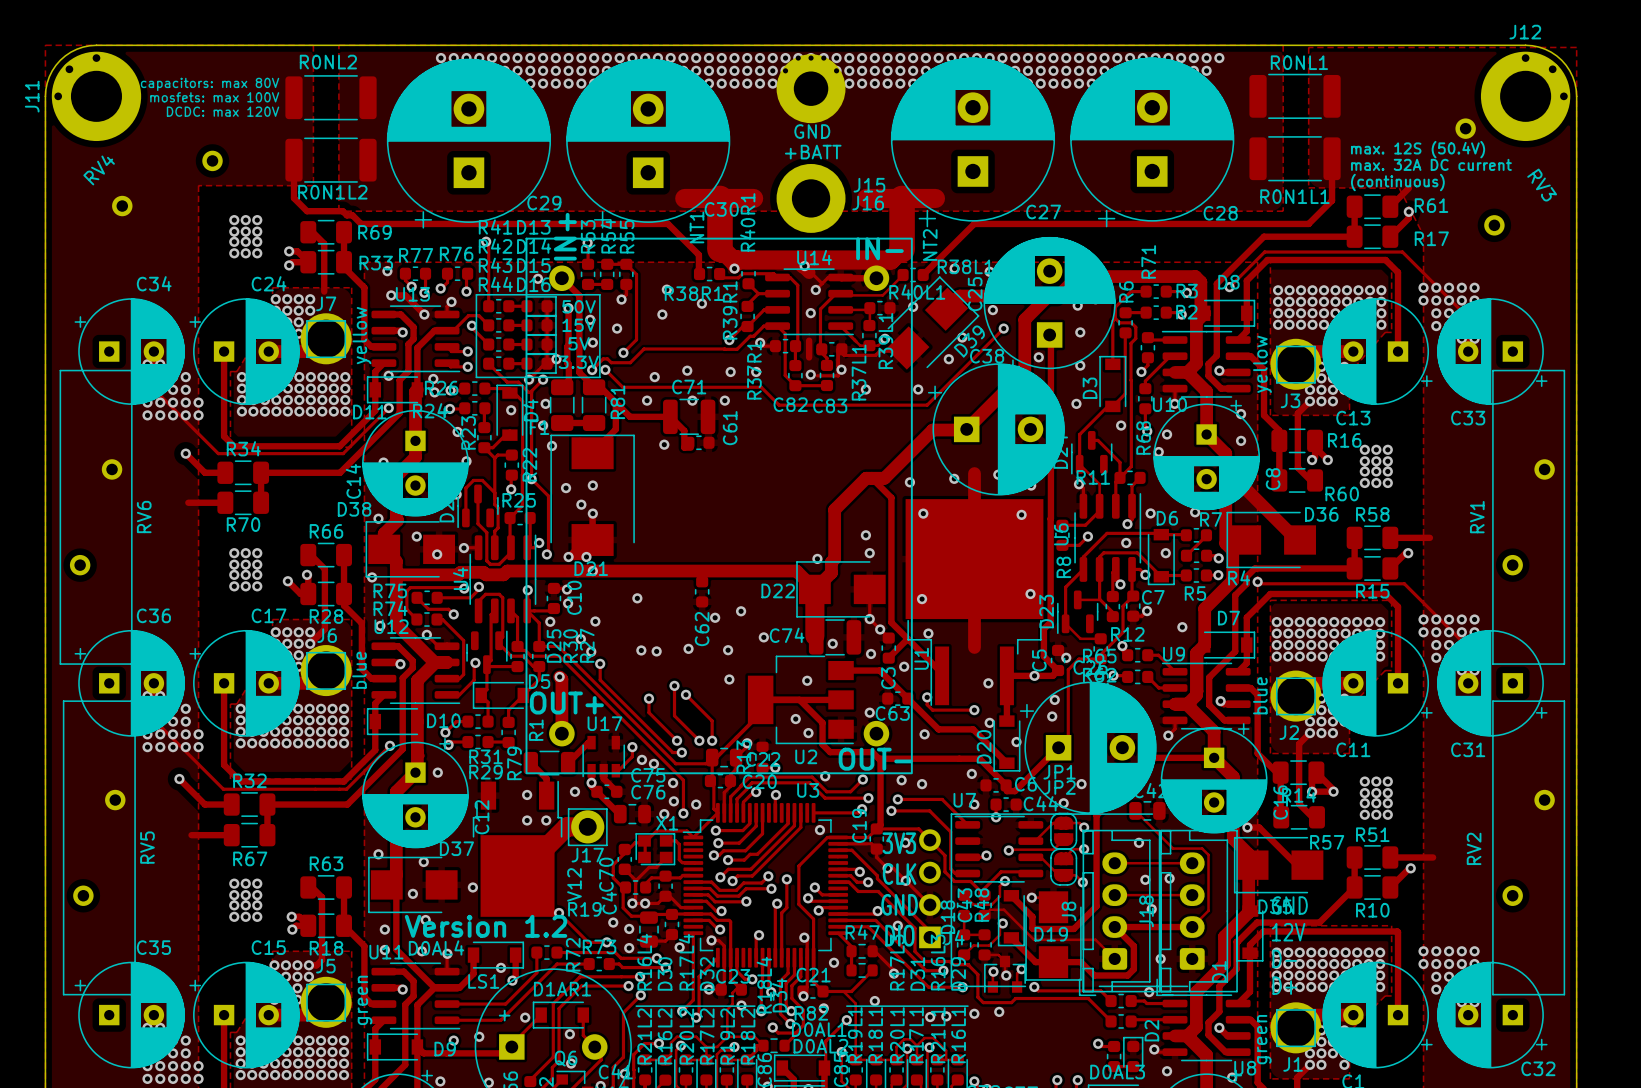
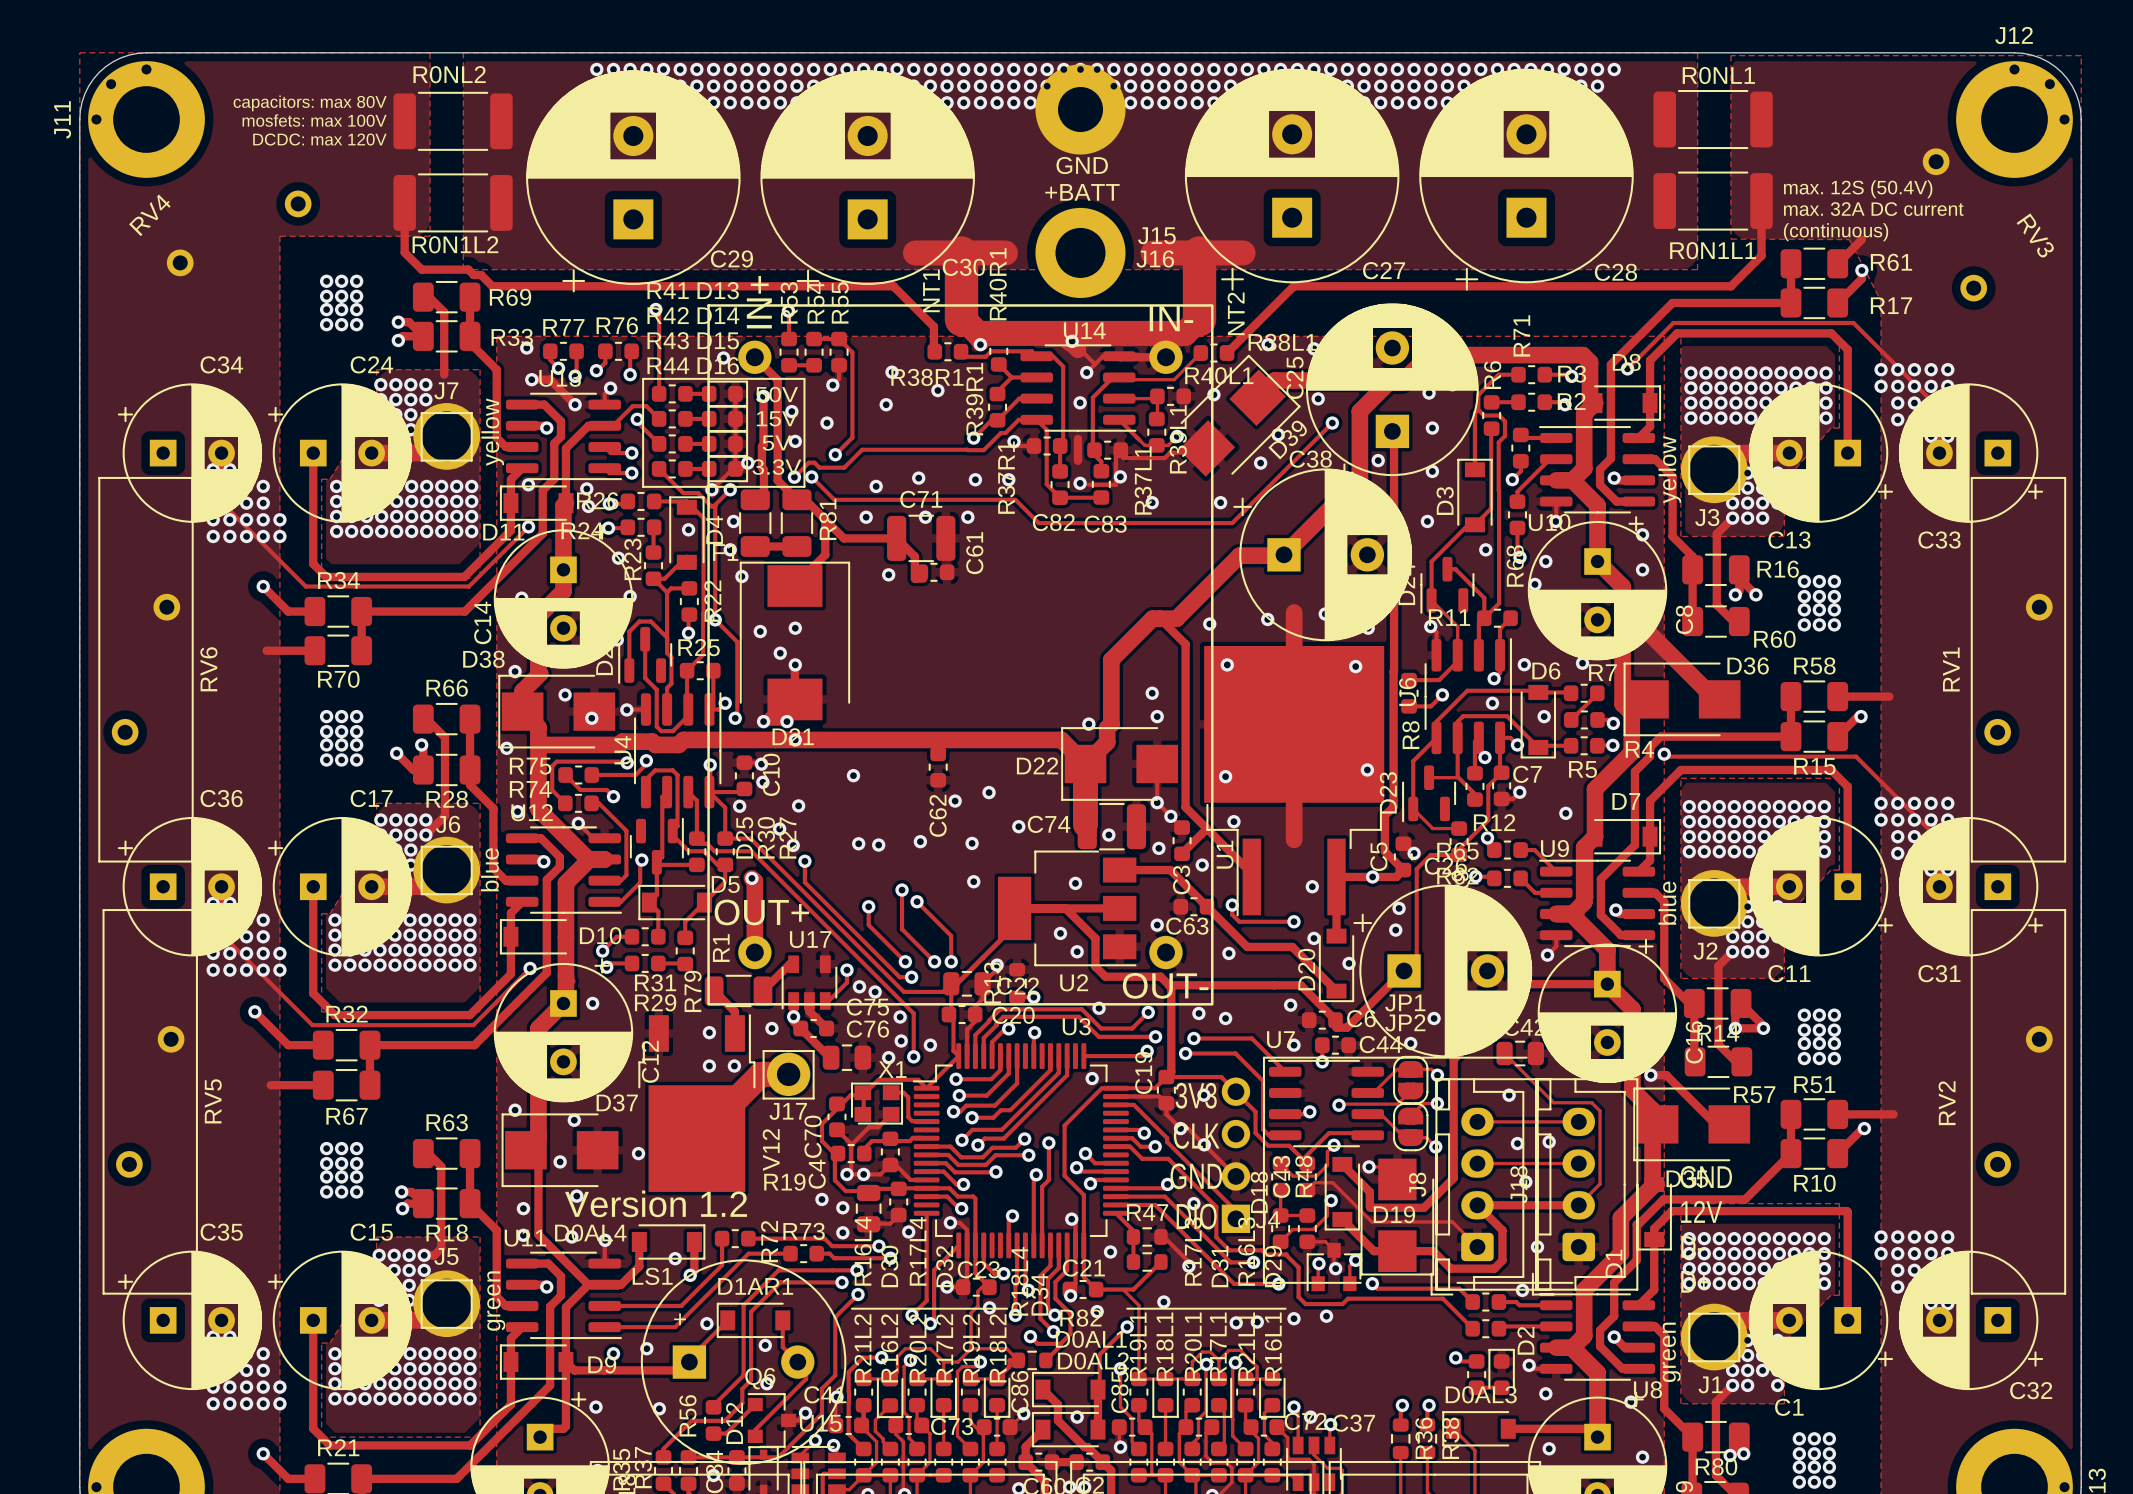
track: (559, 913) (588, 942) (606, 942) -> none
via: (559, 913) -> none
via: (606, 942) -> none

